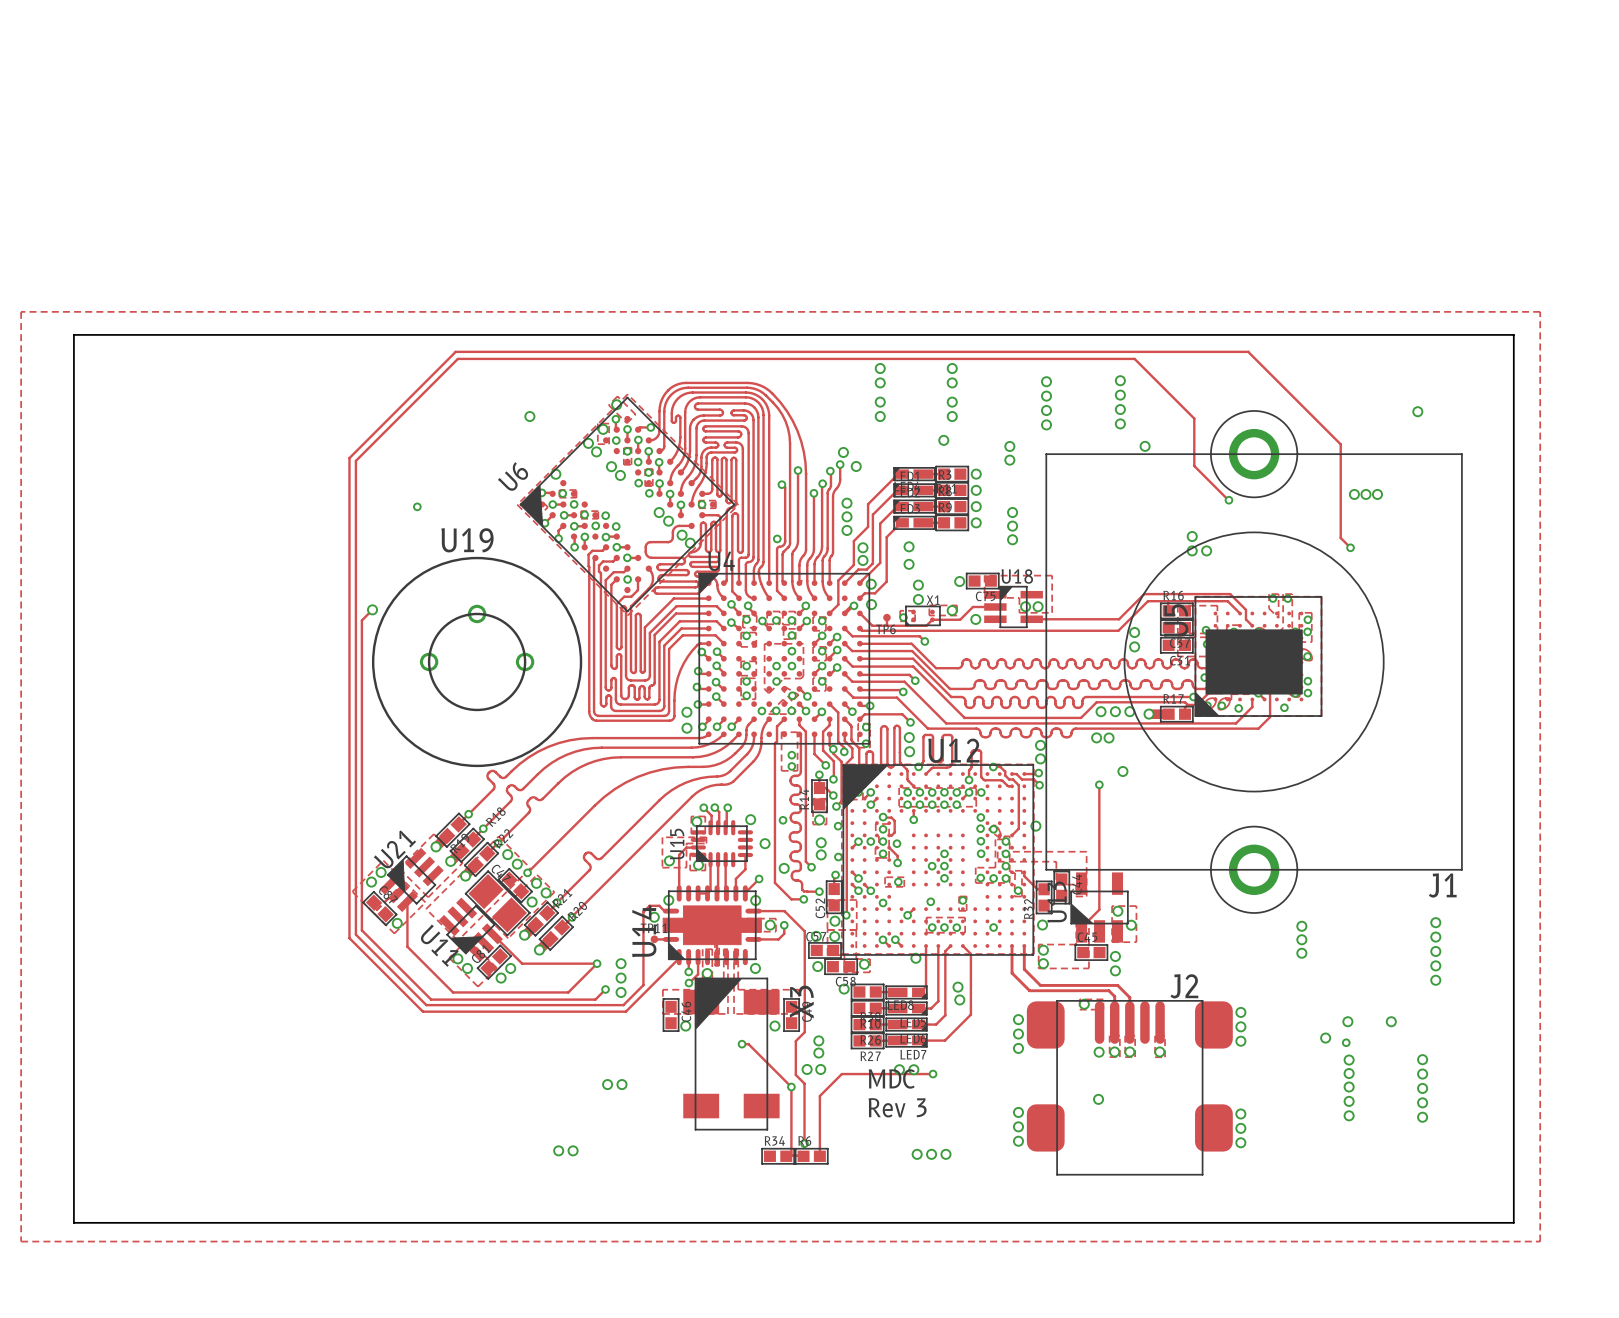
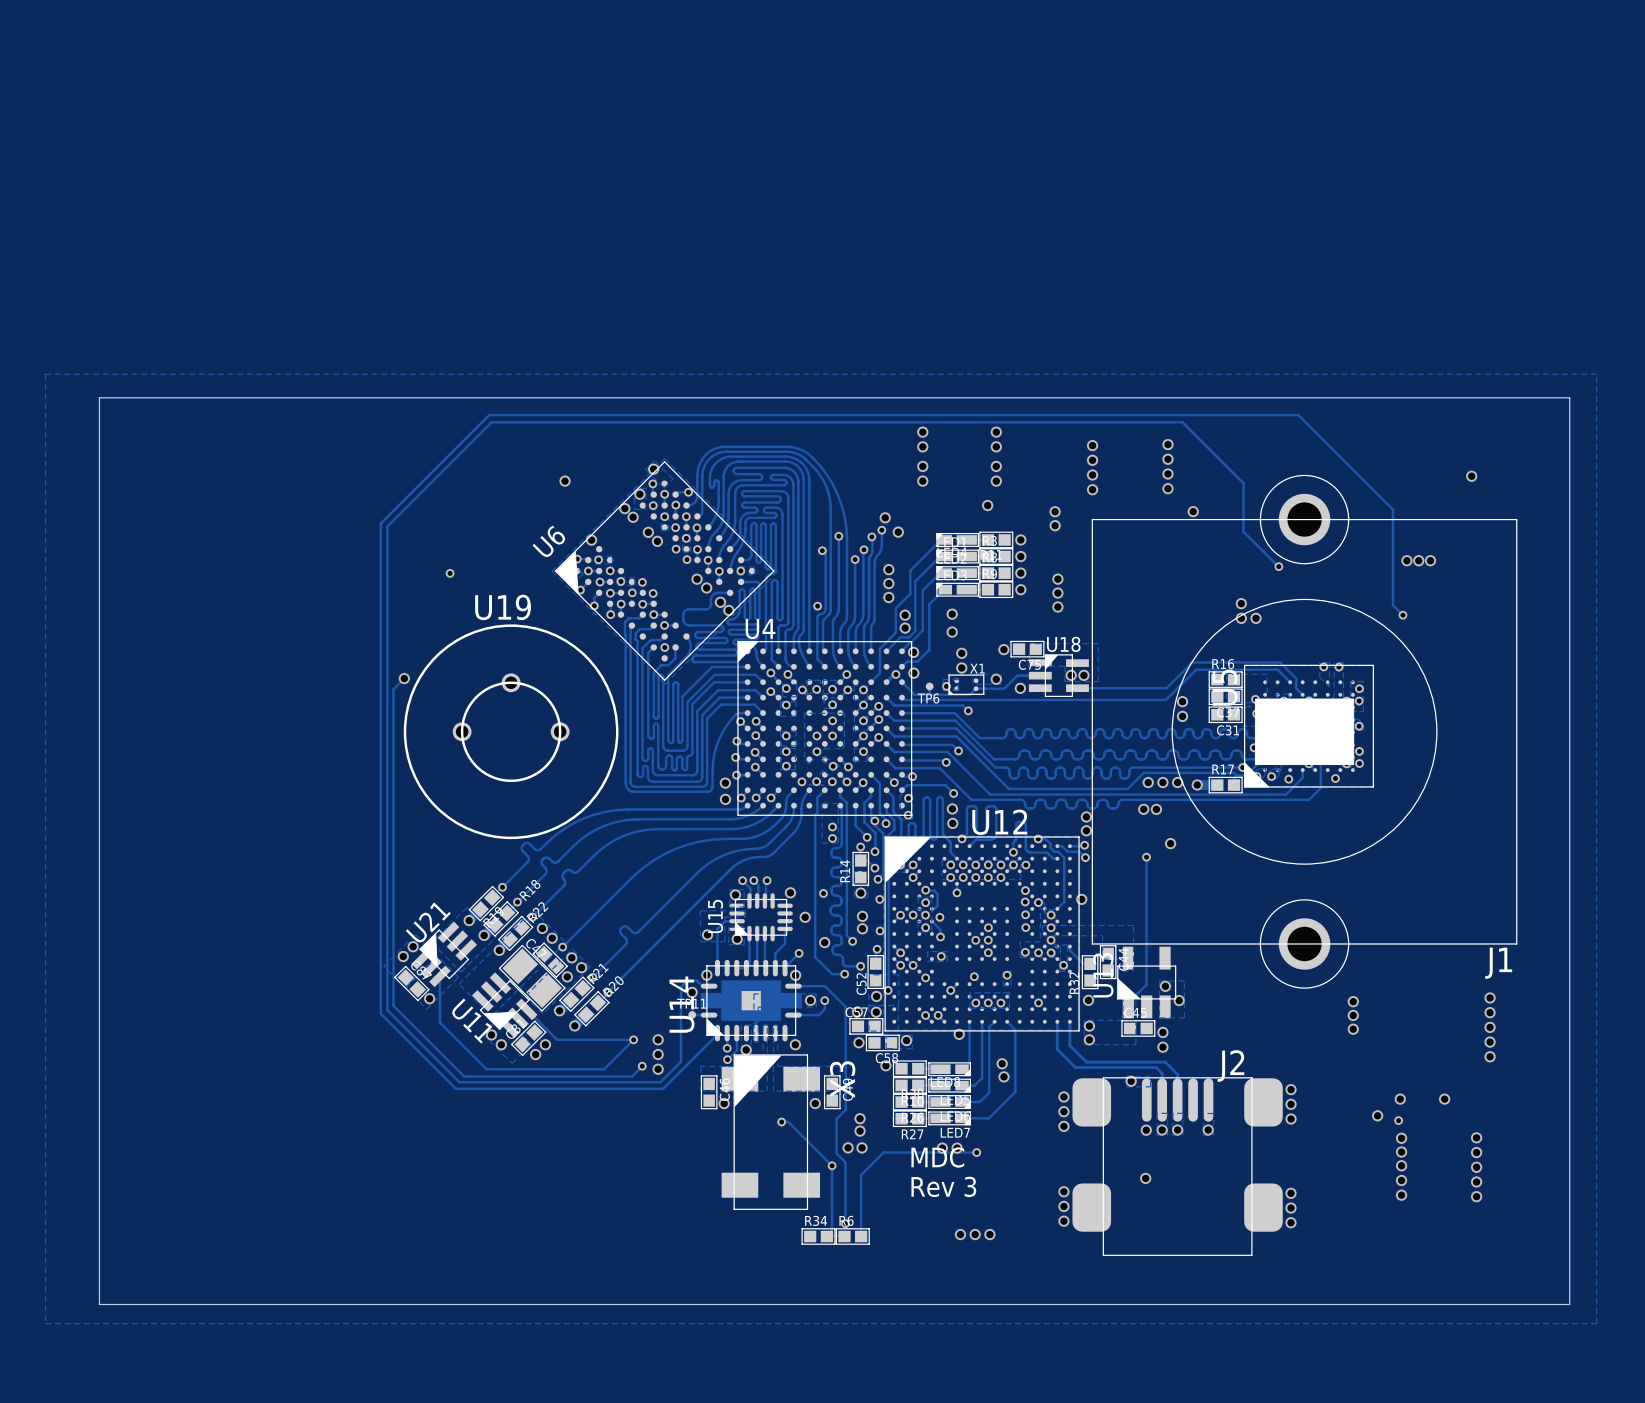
via: (607, 1084) -> none
via: (621, 1084) -> none
via: (558, 1150) -> none
via: (573, 1150) -> none

